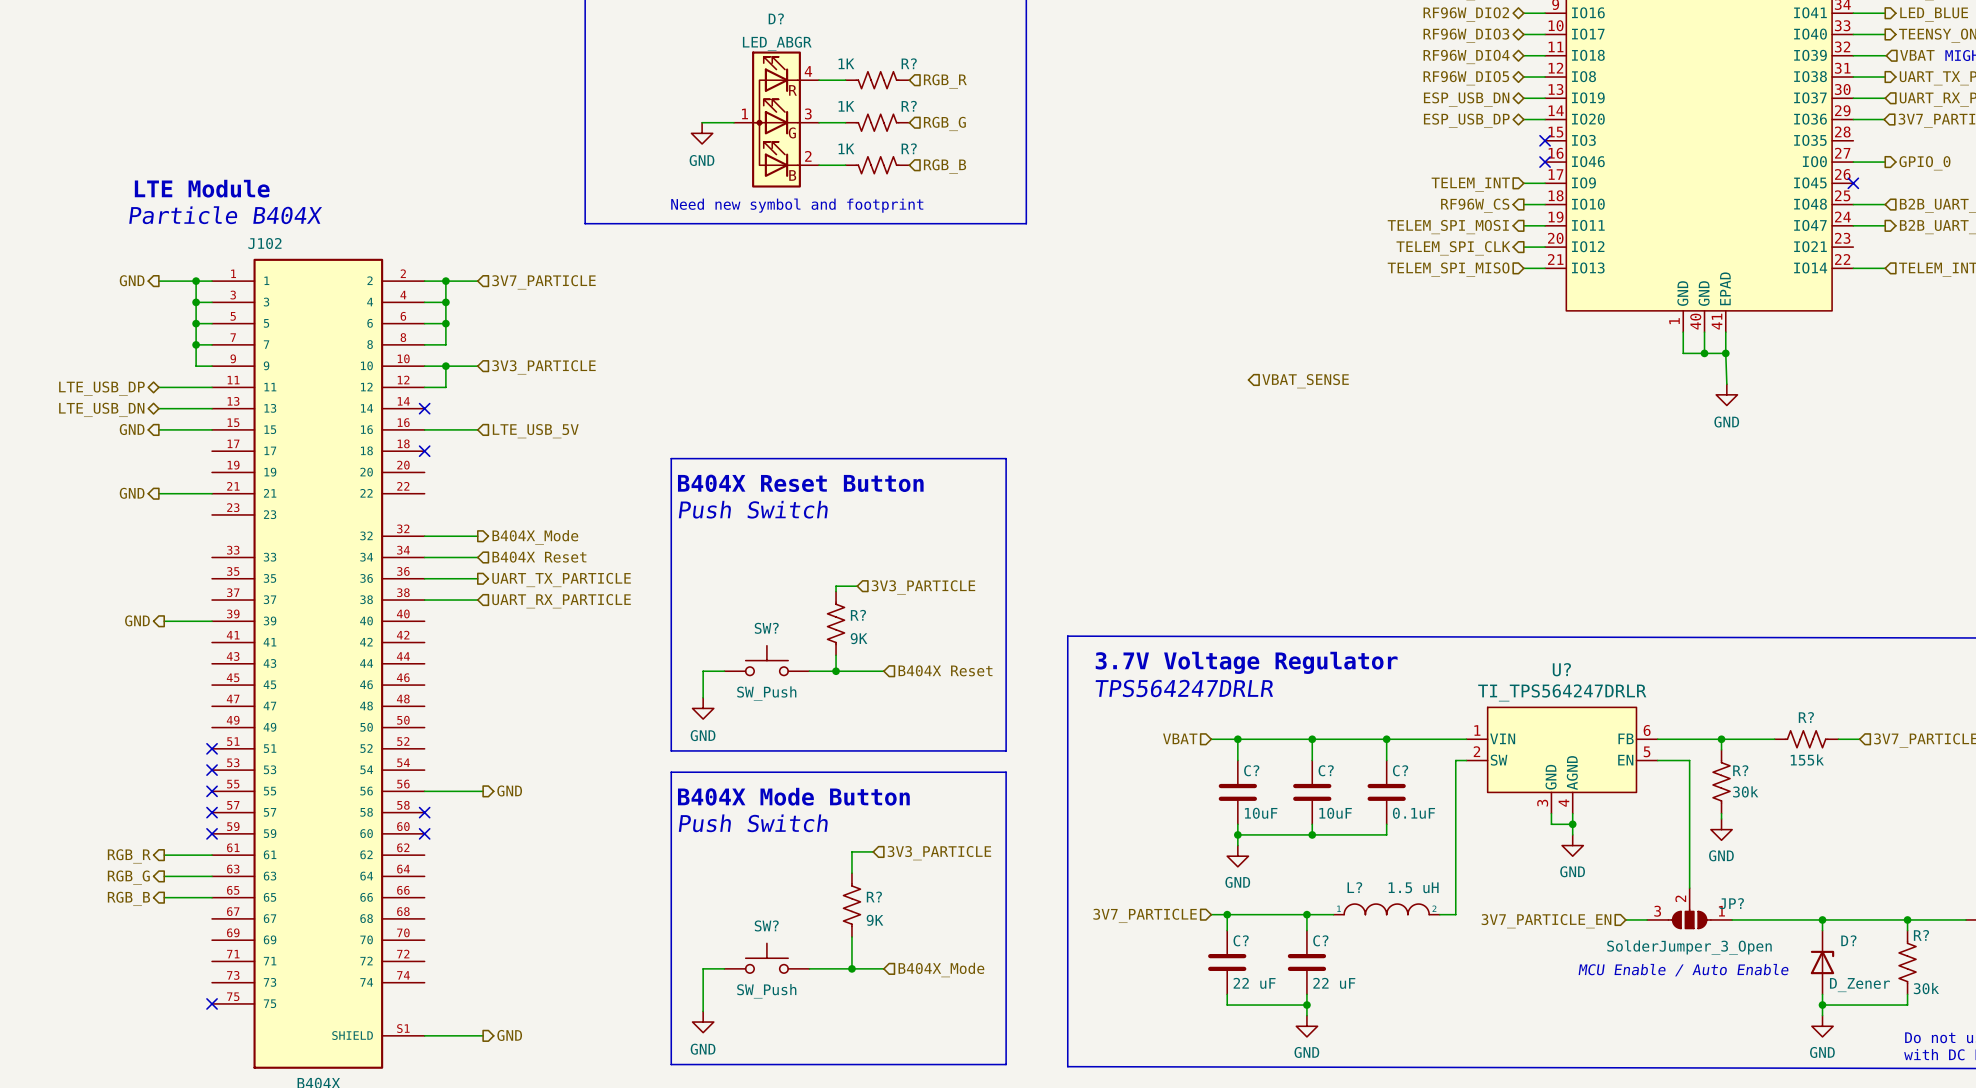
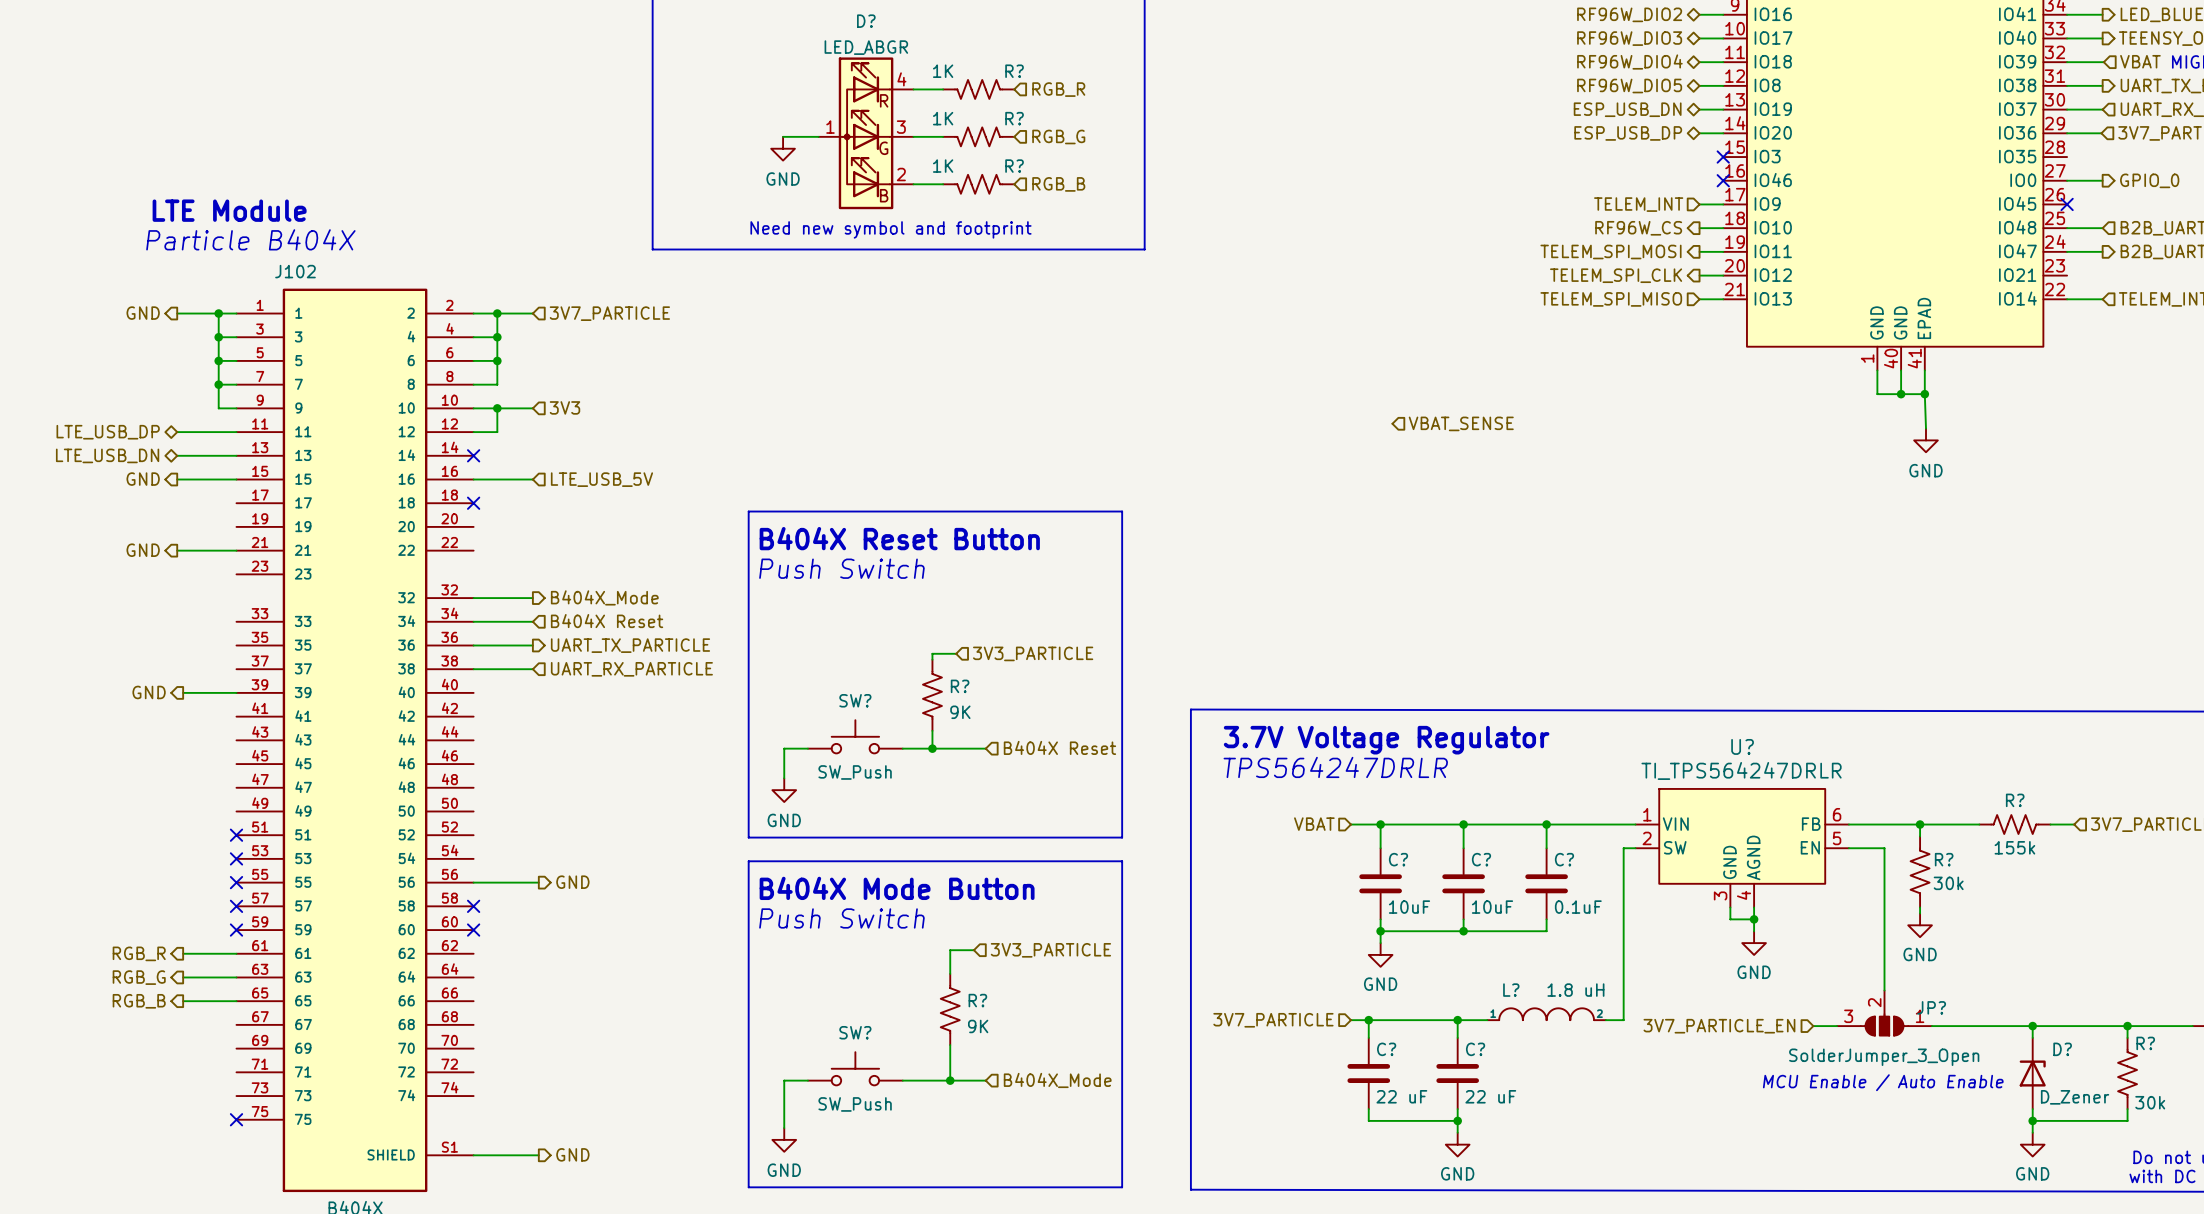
hierarchical label: 3V3_PARTICLE (543, 367) -> 3V3 (564, 407)
L? value: 1.5 uH (1413, 887) -> 1.8 uH (1575, 990)

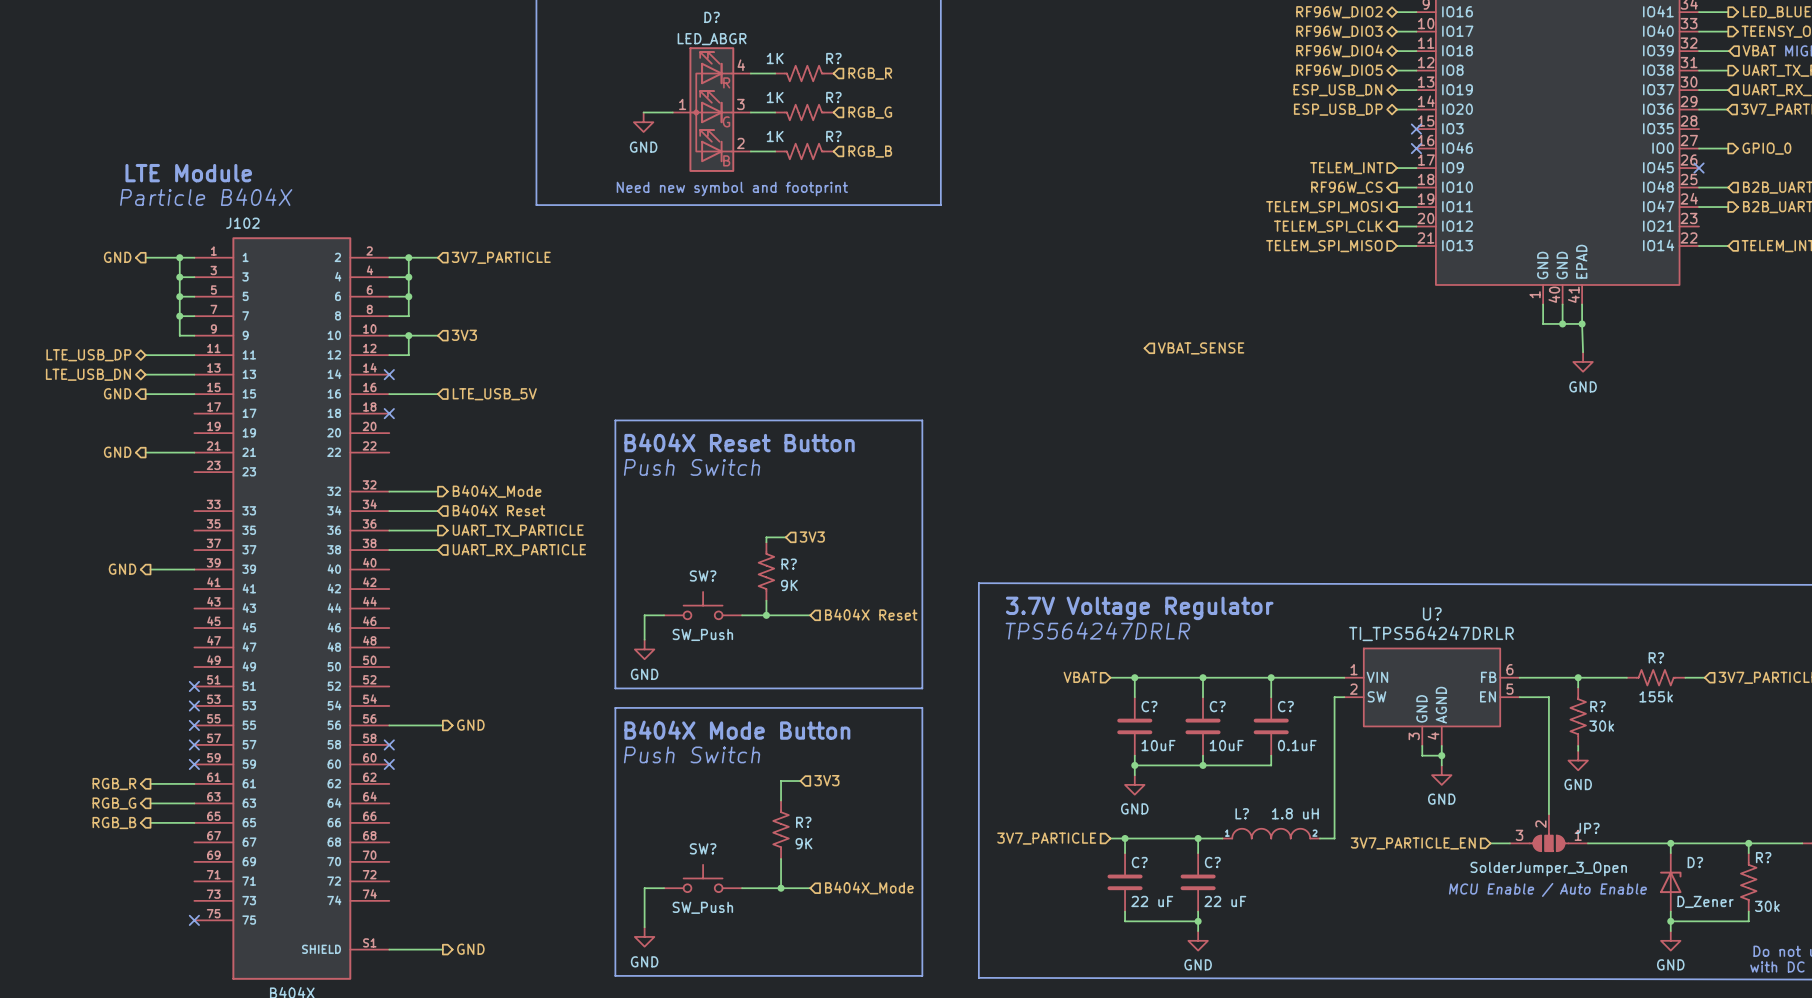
hierarchical label: 3V3_PARTICLE (1033, 653) -> 3V3 (812, 537)
hierarchical label: 3V3_PARTICLE (1050, 950) -> 3V3 (826, 780)

